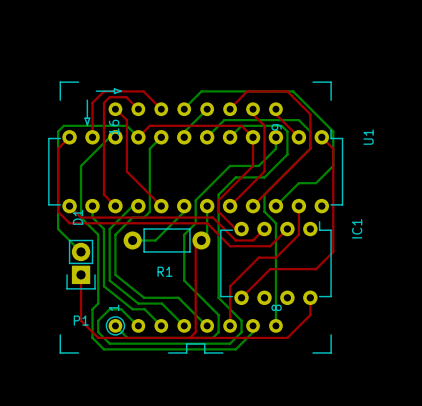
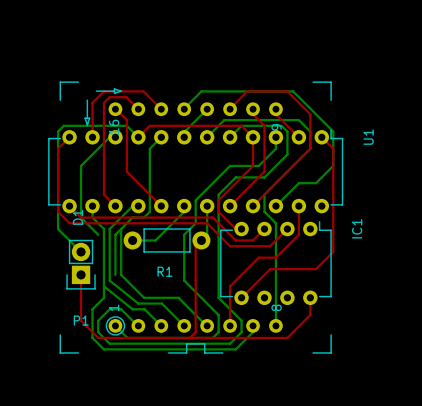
bottom track: (98, 234) (98, 303) -> (103, 286) (103, 297) (98, 303)
bottom track: (115, 274) (144, 297) -> (121, 229) (121, 274) (144, 297)

